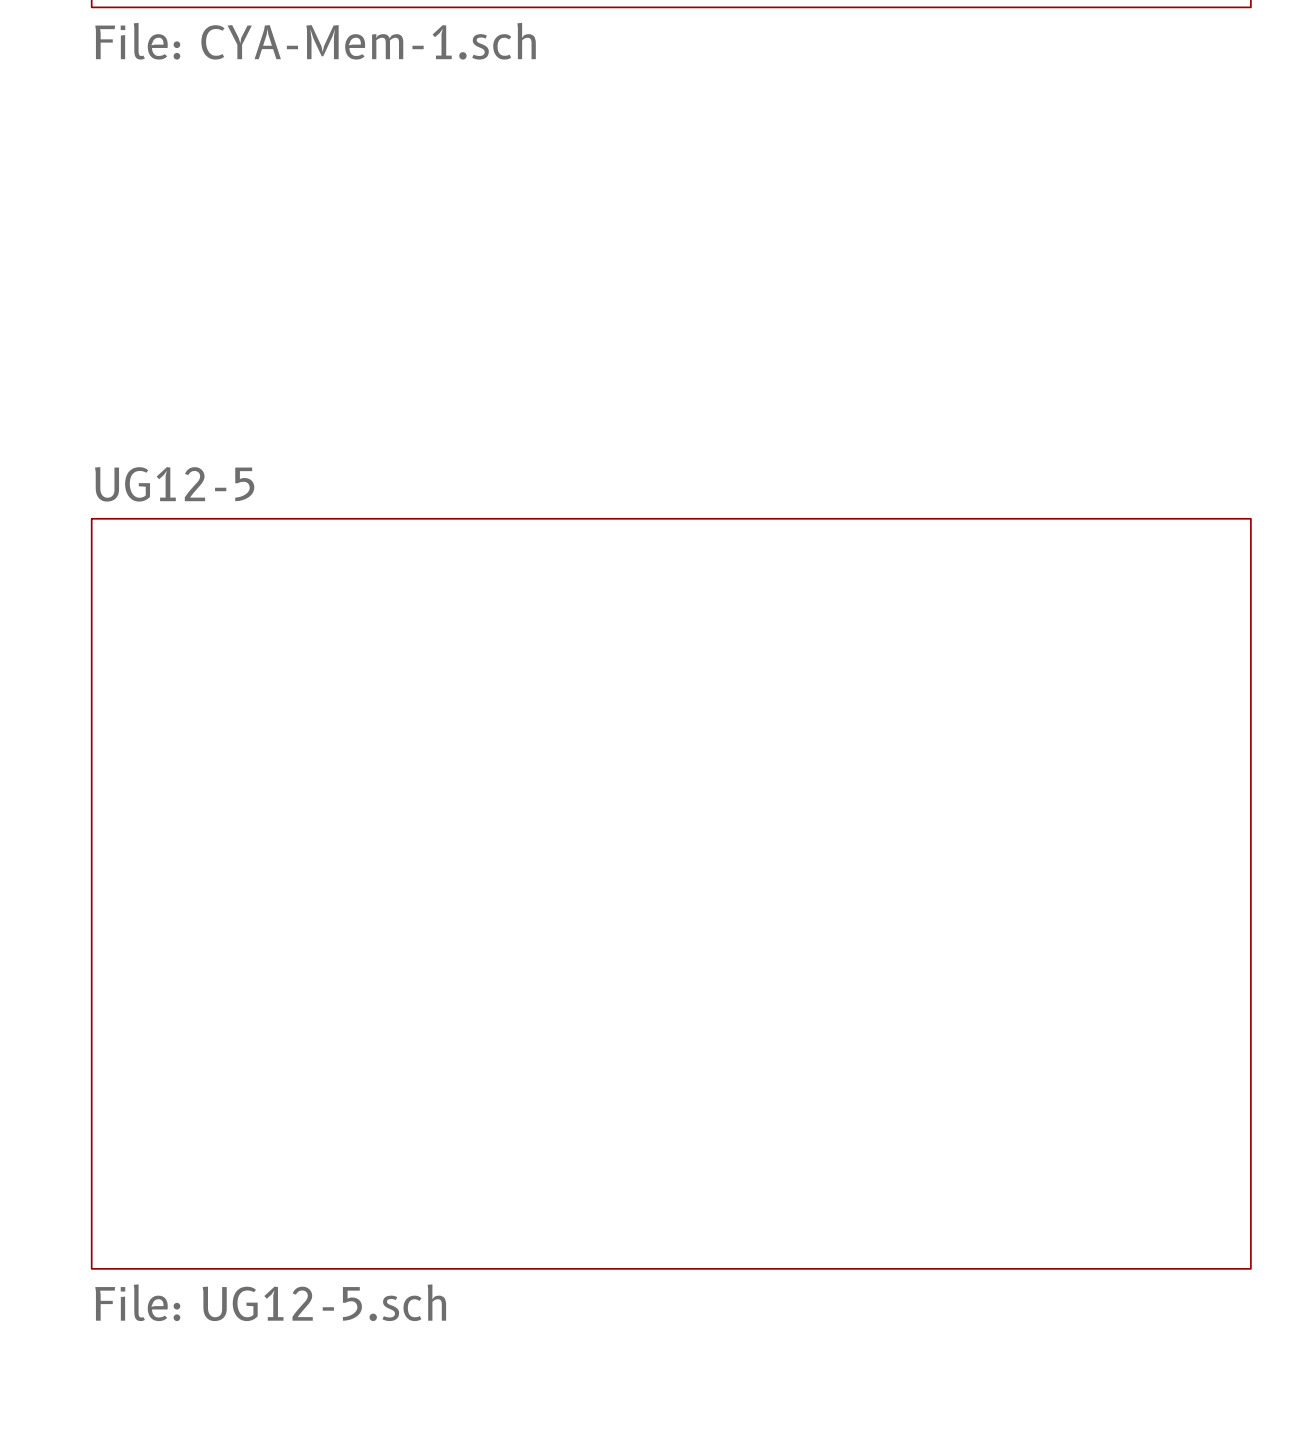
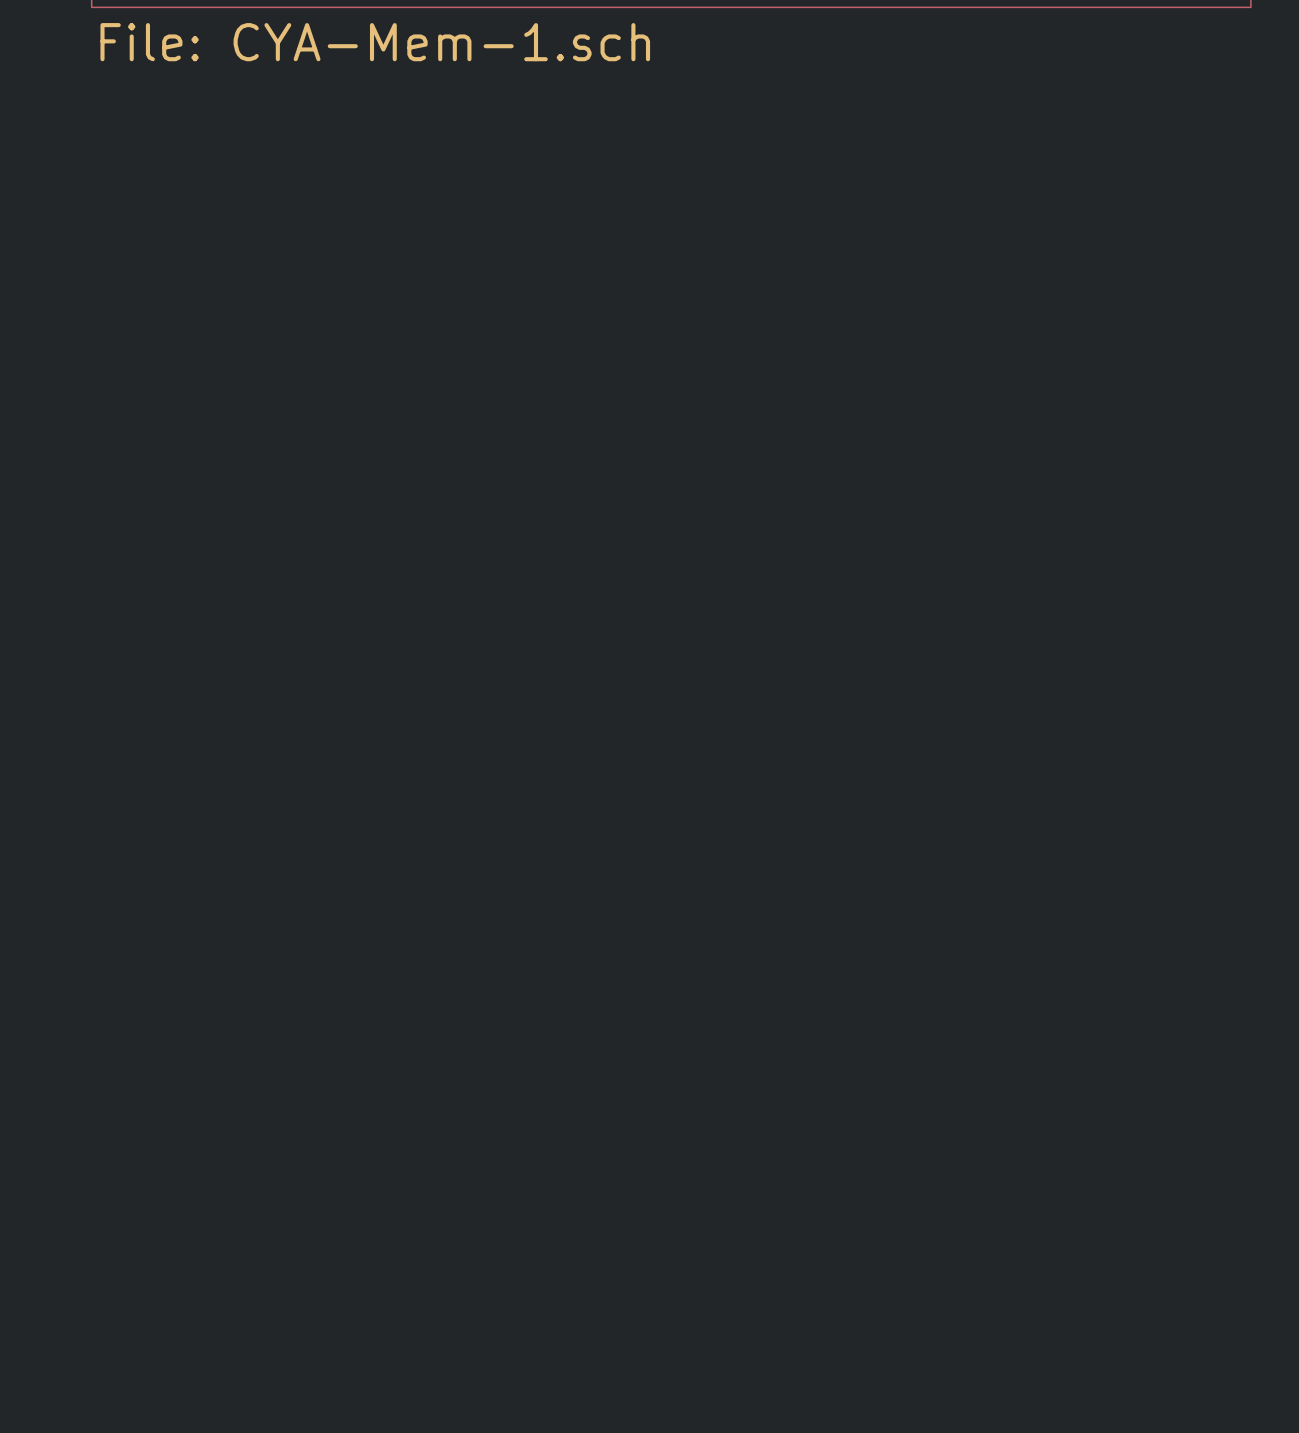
sheet UG12-5: File: UG12-5.sch (671, 893) -> none

